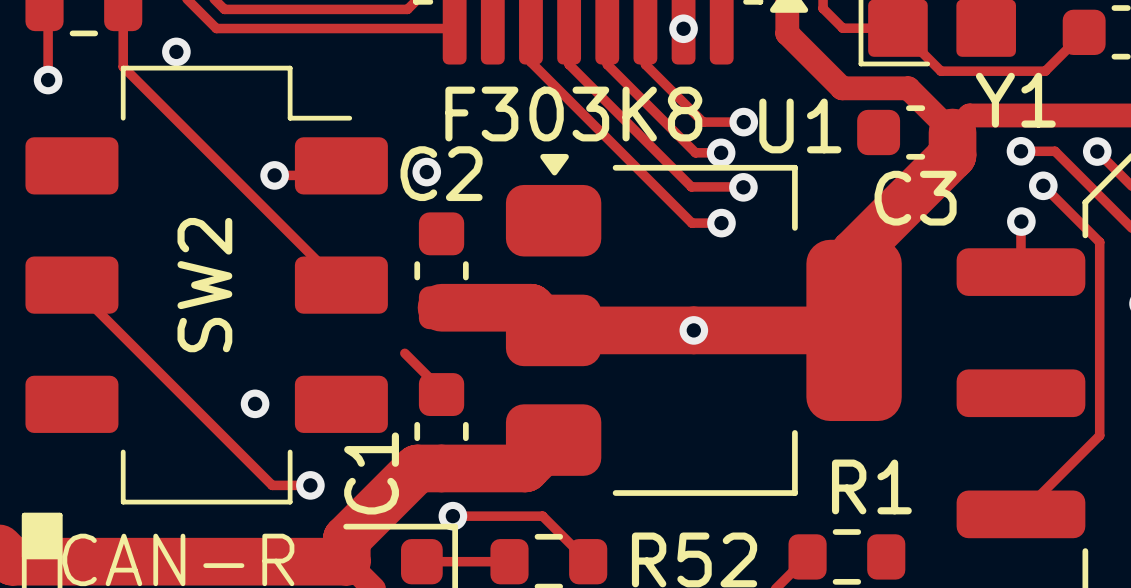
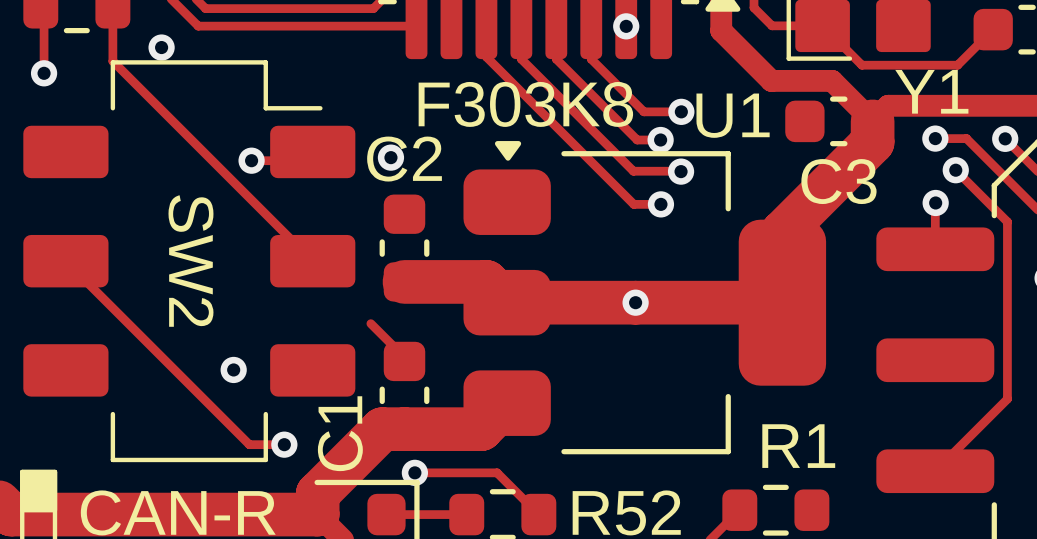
SW2 name rotation: 0° (204, 285) -> 180° (190, 261)

